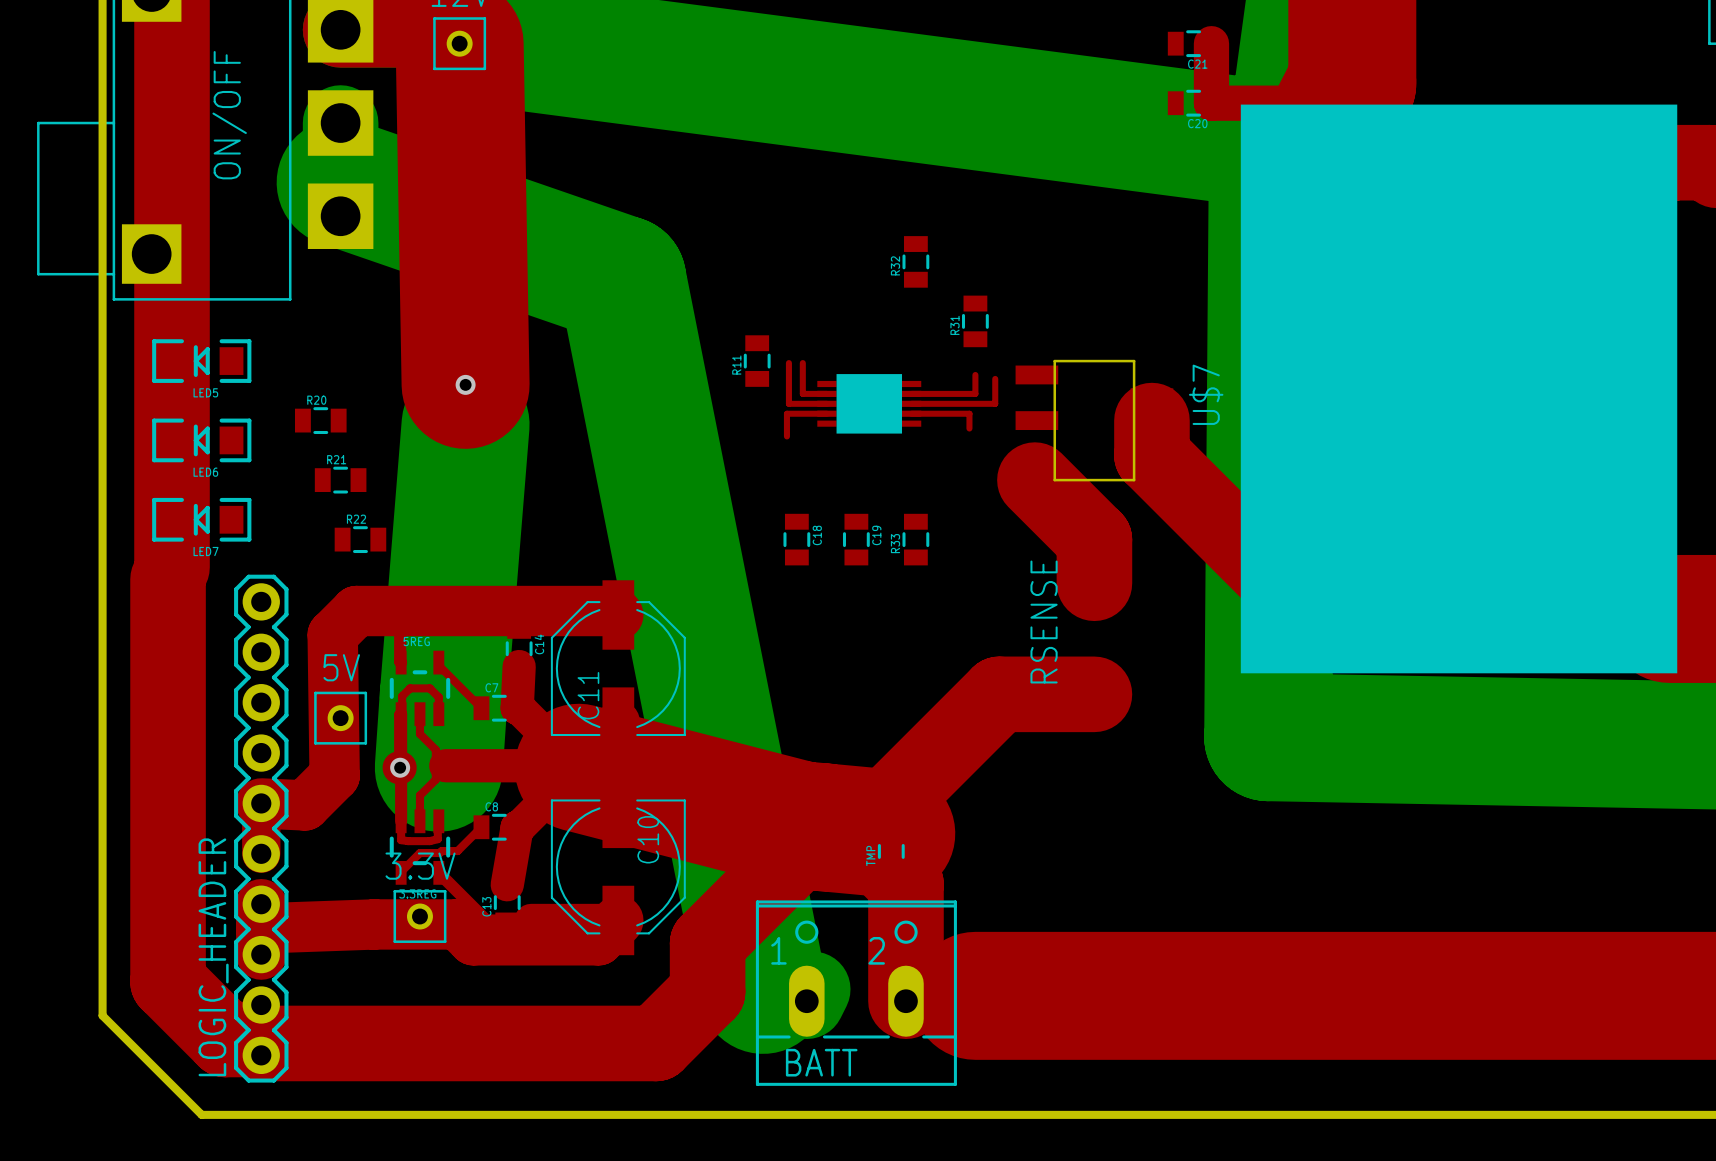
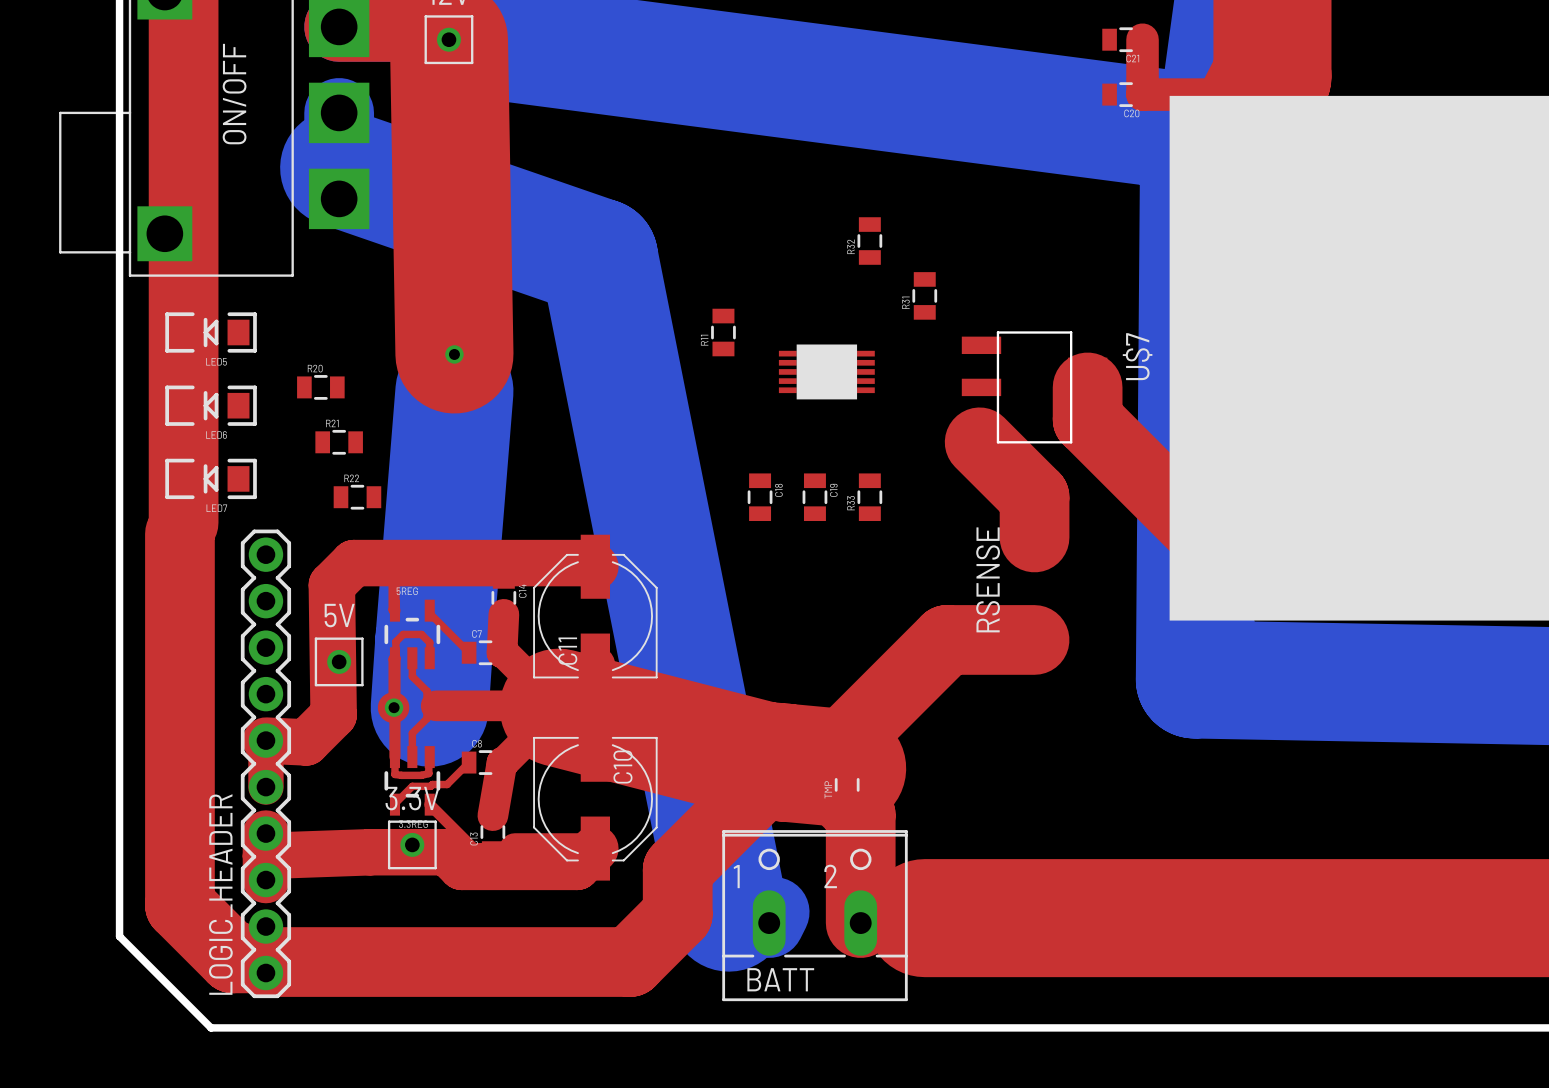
top track: (788, 363) (788, 403) (826, 403) -> none
top track: (802, 363) (802, 393) (826, 393) -> none
top track: (975, 374) (975, 393) (911, 393) -> none
top track: (995, 378) (995, 403) (911, 403) -> none
top track: (826, 413) (786, 413) (786, 436) -> none
top track: (911, 413) (969, 413) (969, 428) -> none

